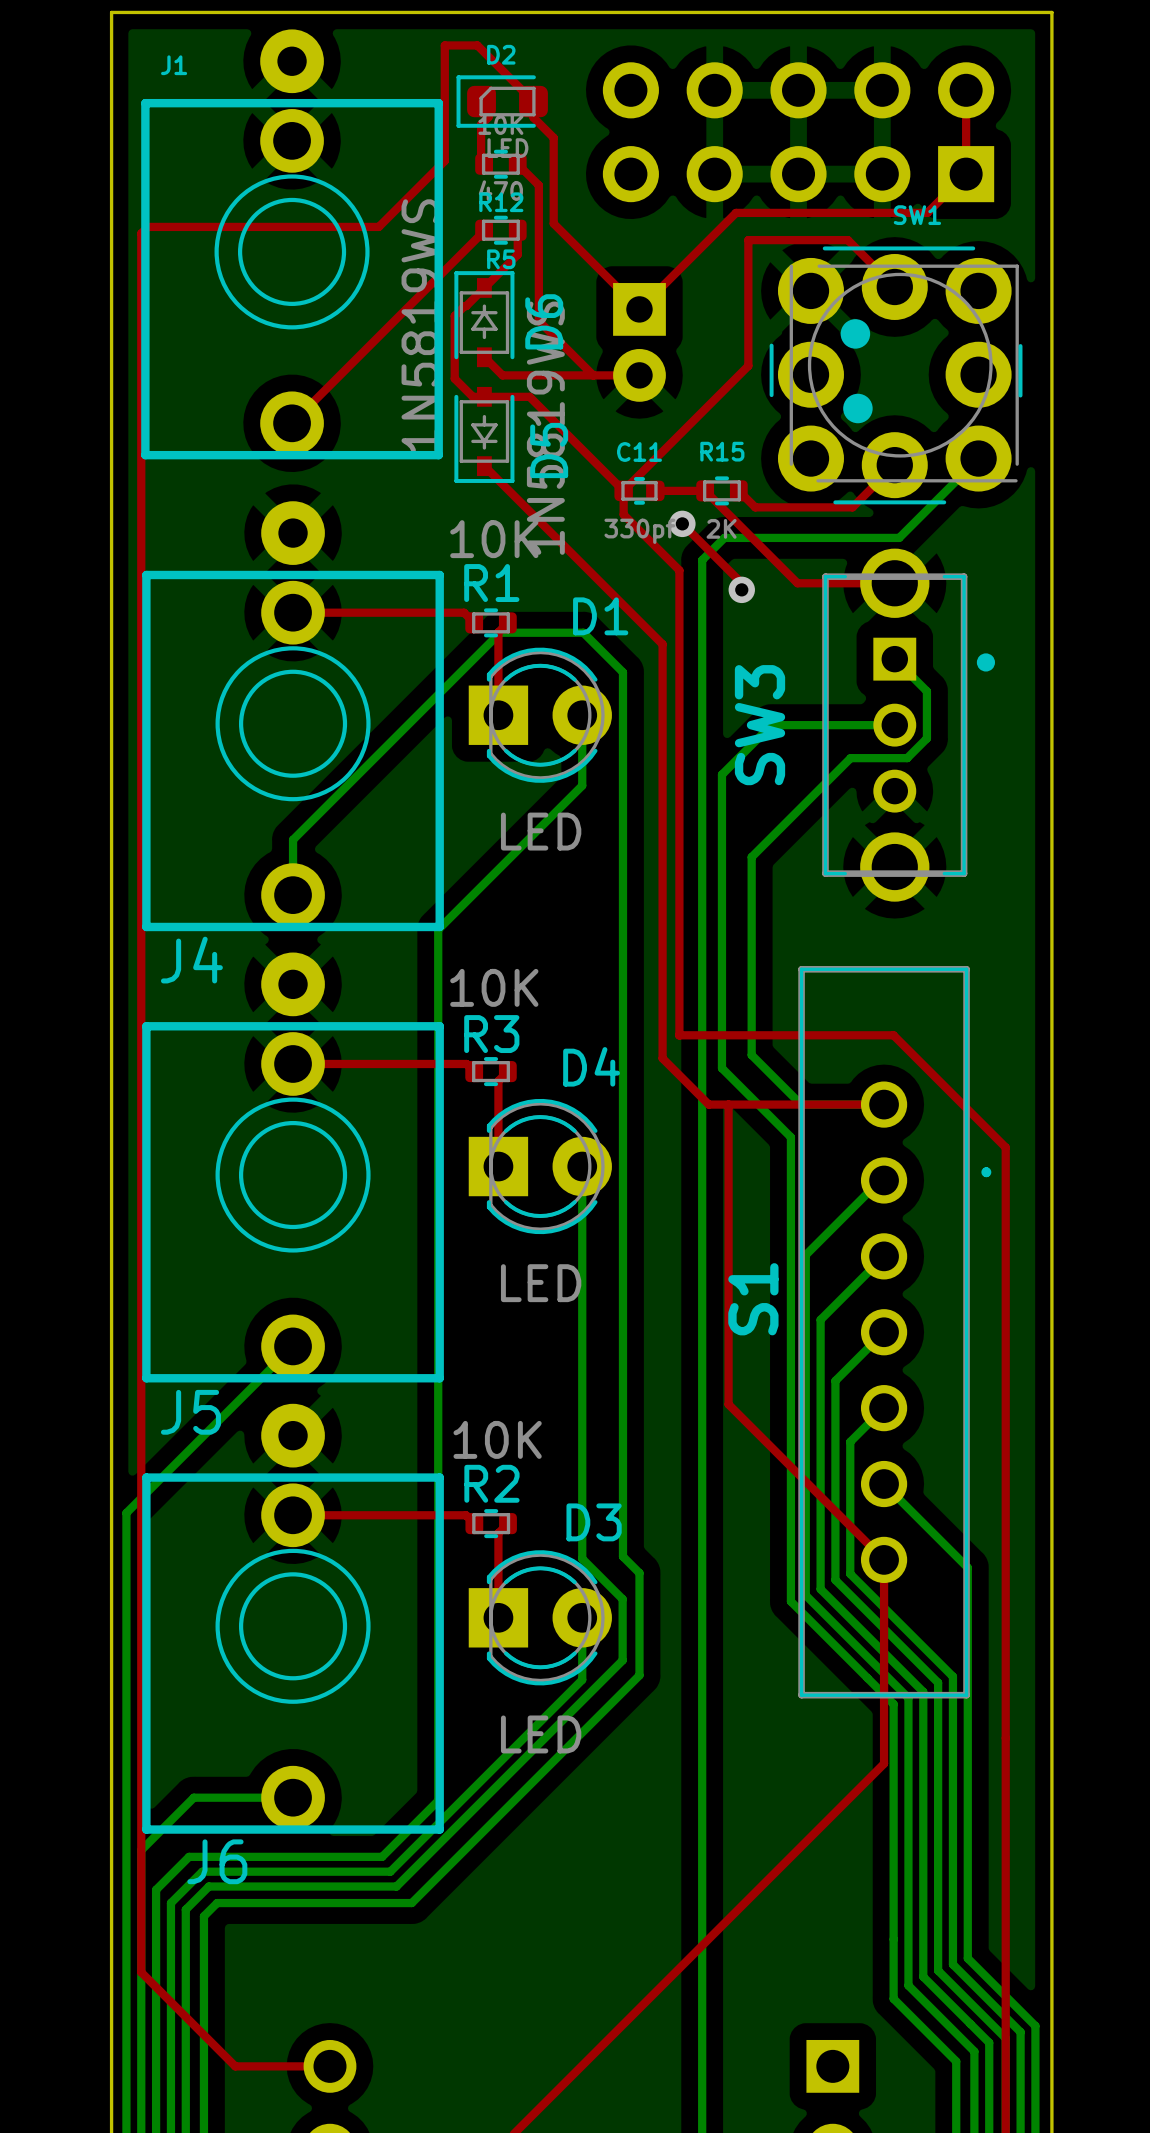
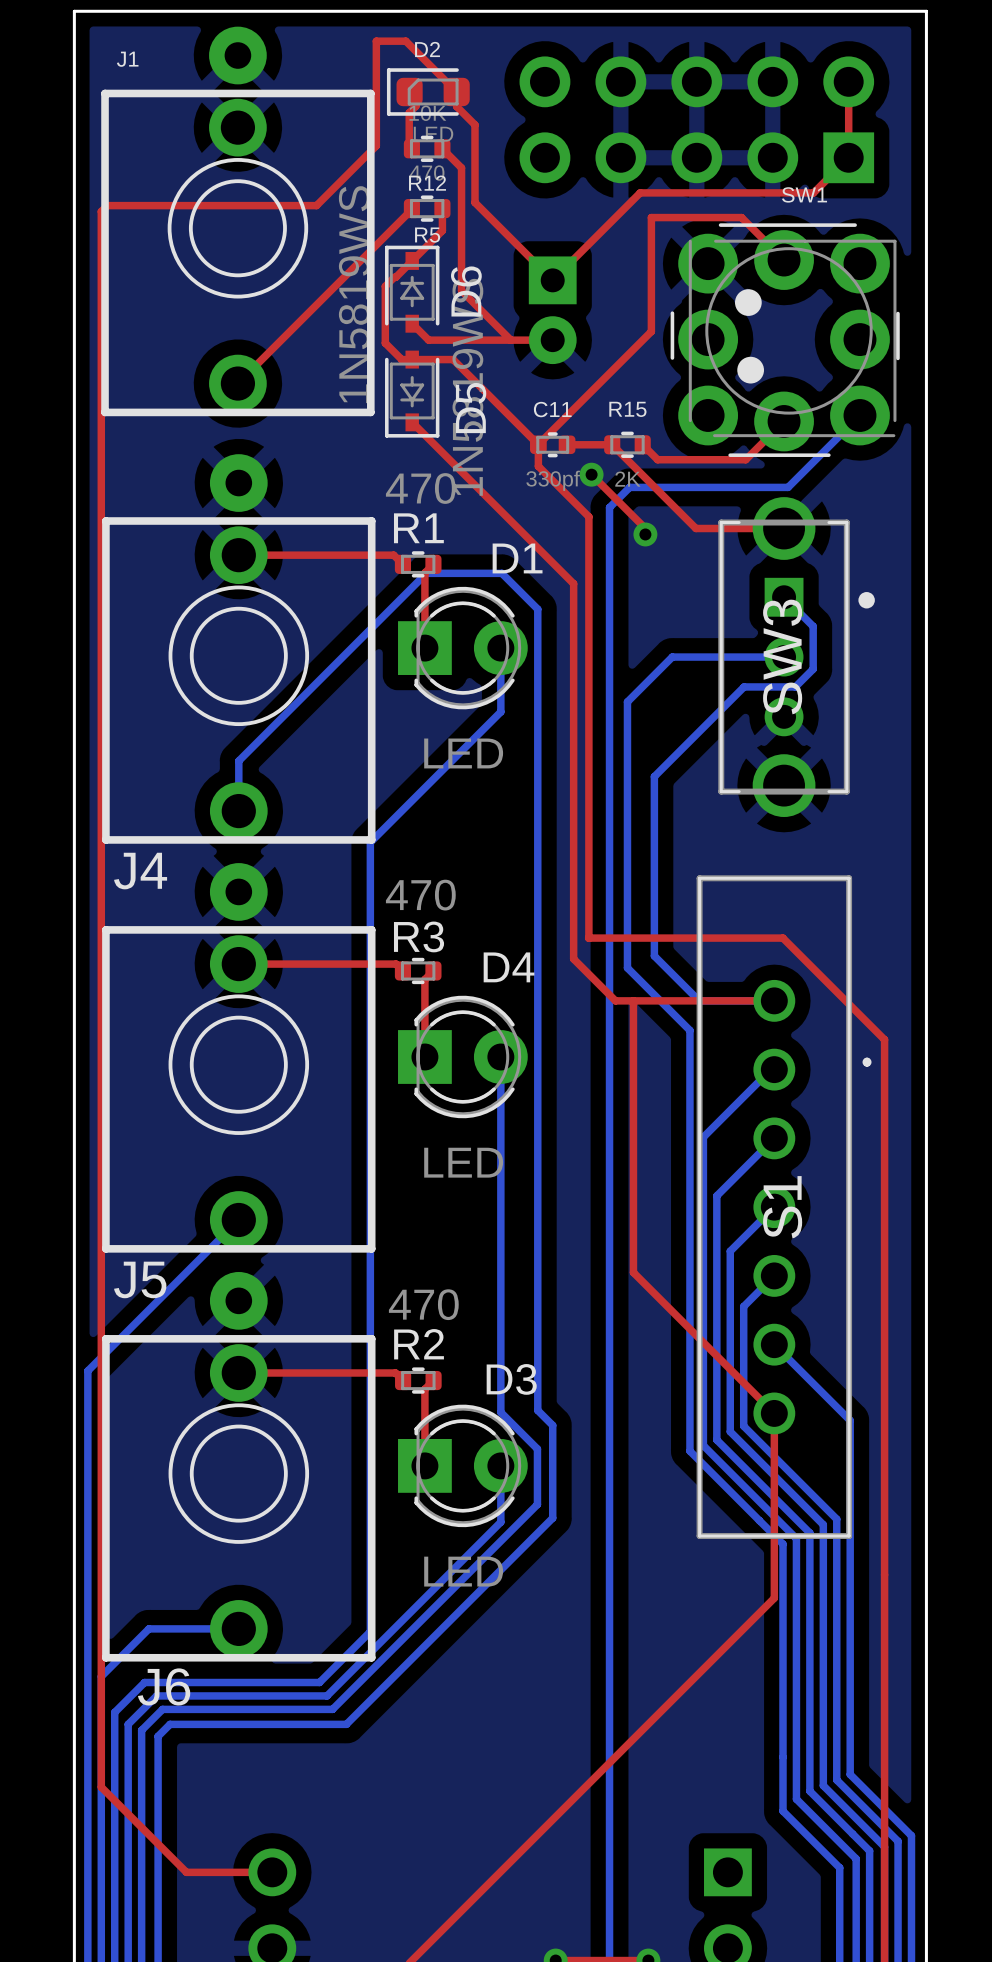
R1 value: 10K (494, 539) -> 470 (420, 488)
SW3 name position: SW3 (760, 725) -> SW3 (782, 657)
R3 value: 10K (494, 987) -> 470 (420, 895)
S1 name position: S1 (753, 1299) -> S1 (782, 1207)
R2 value: 10K (497, 1439) -> 470 (423, 1304)

